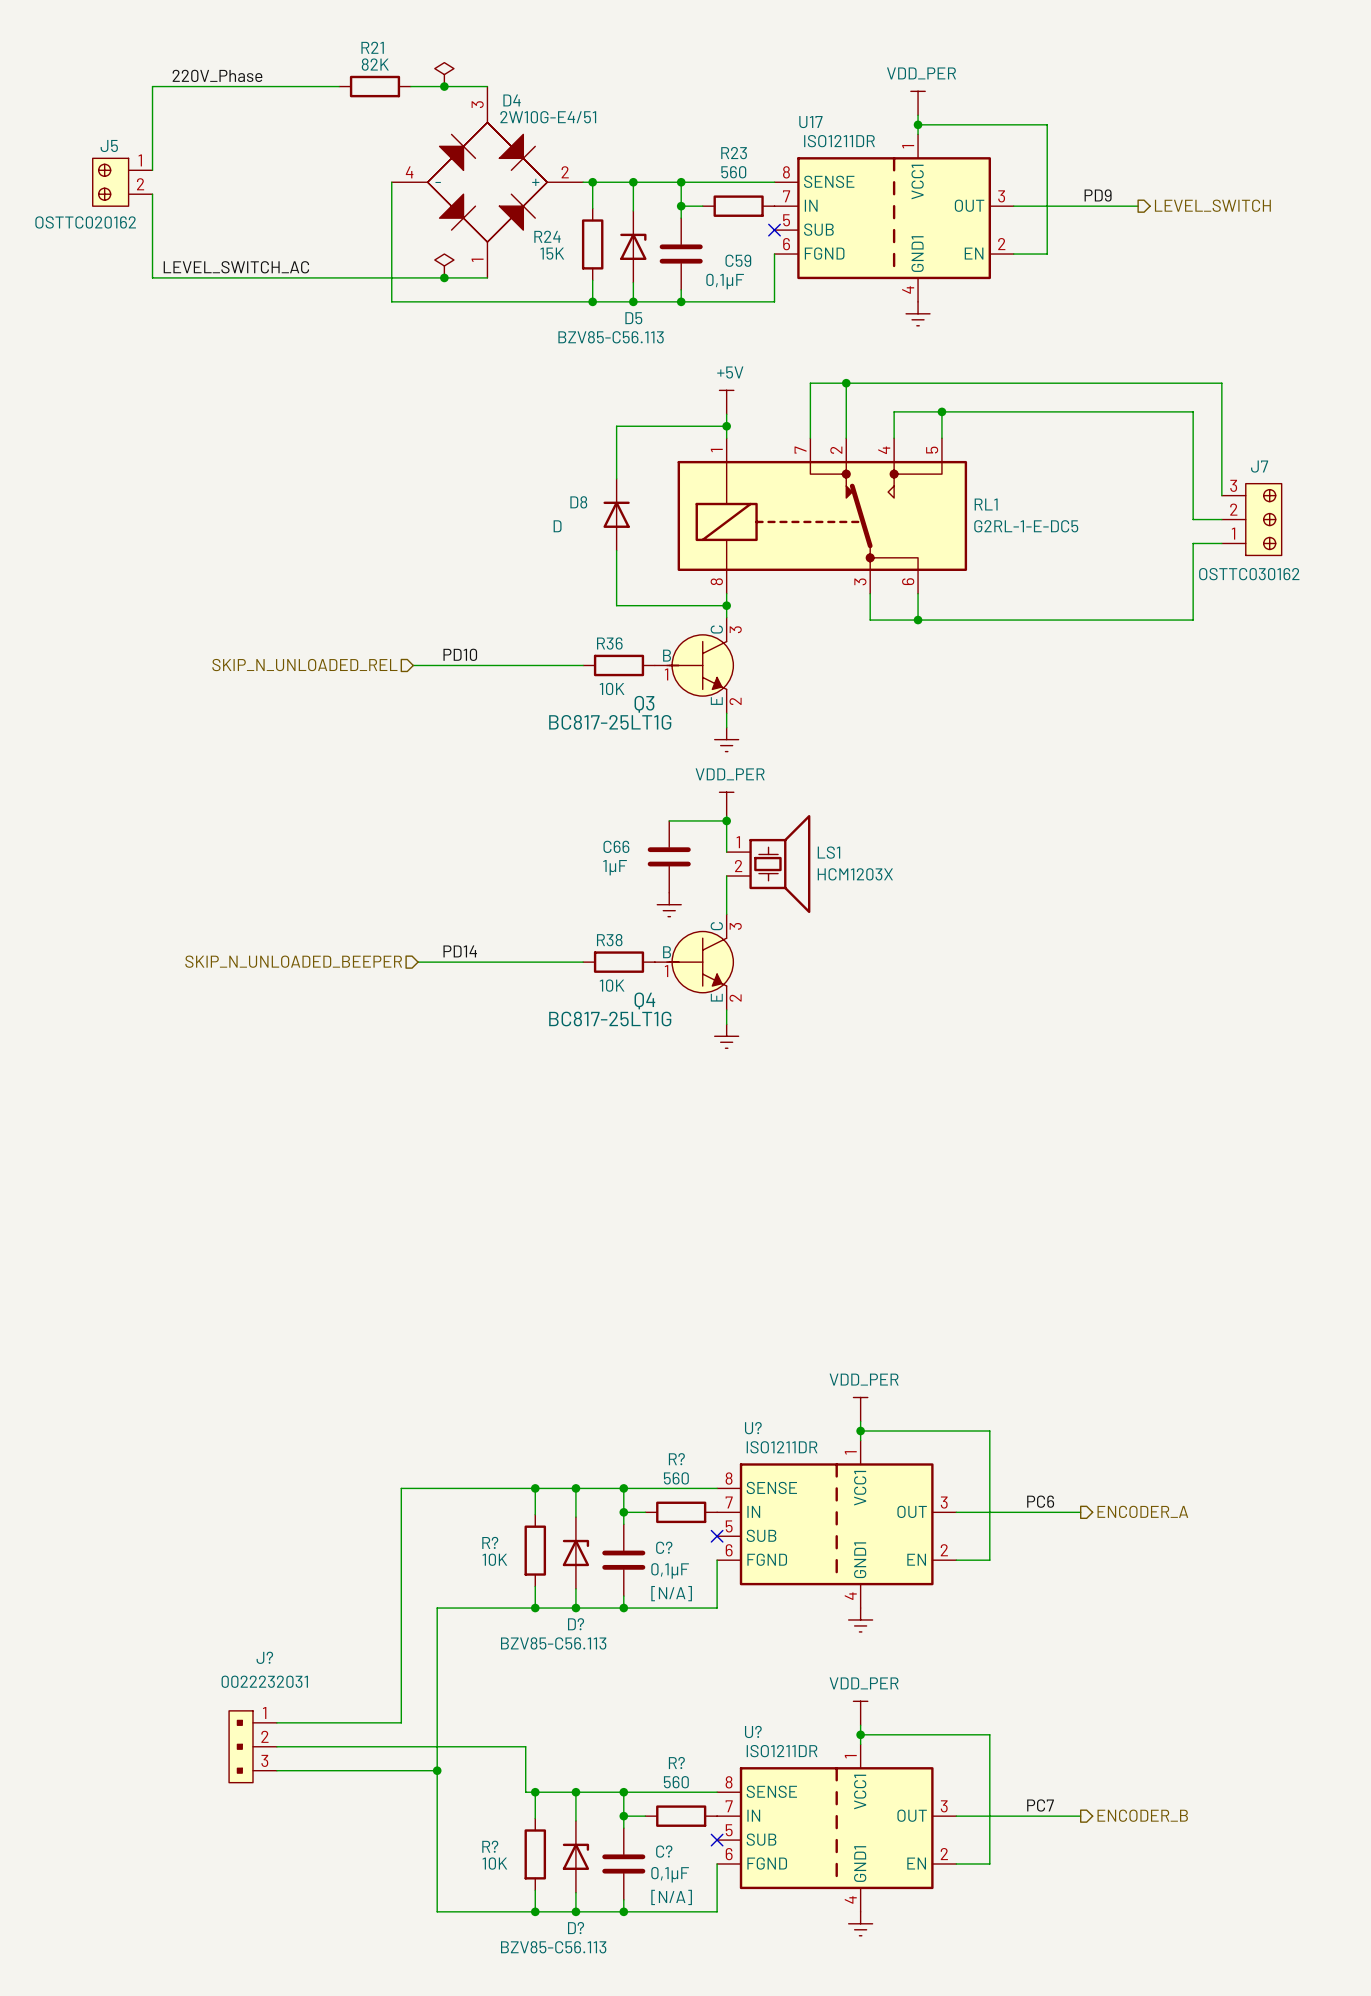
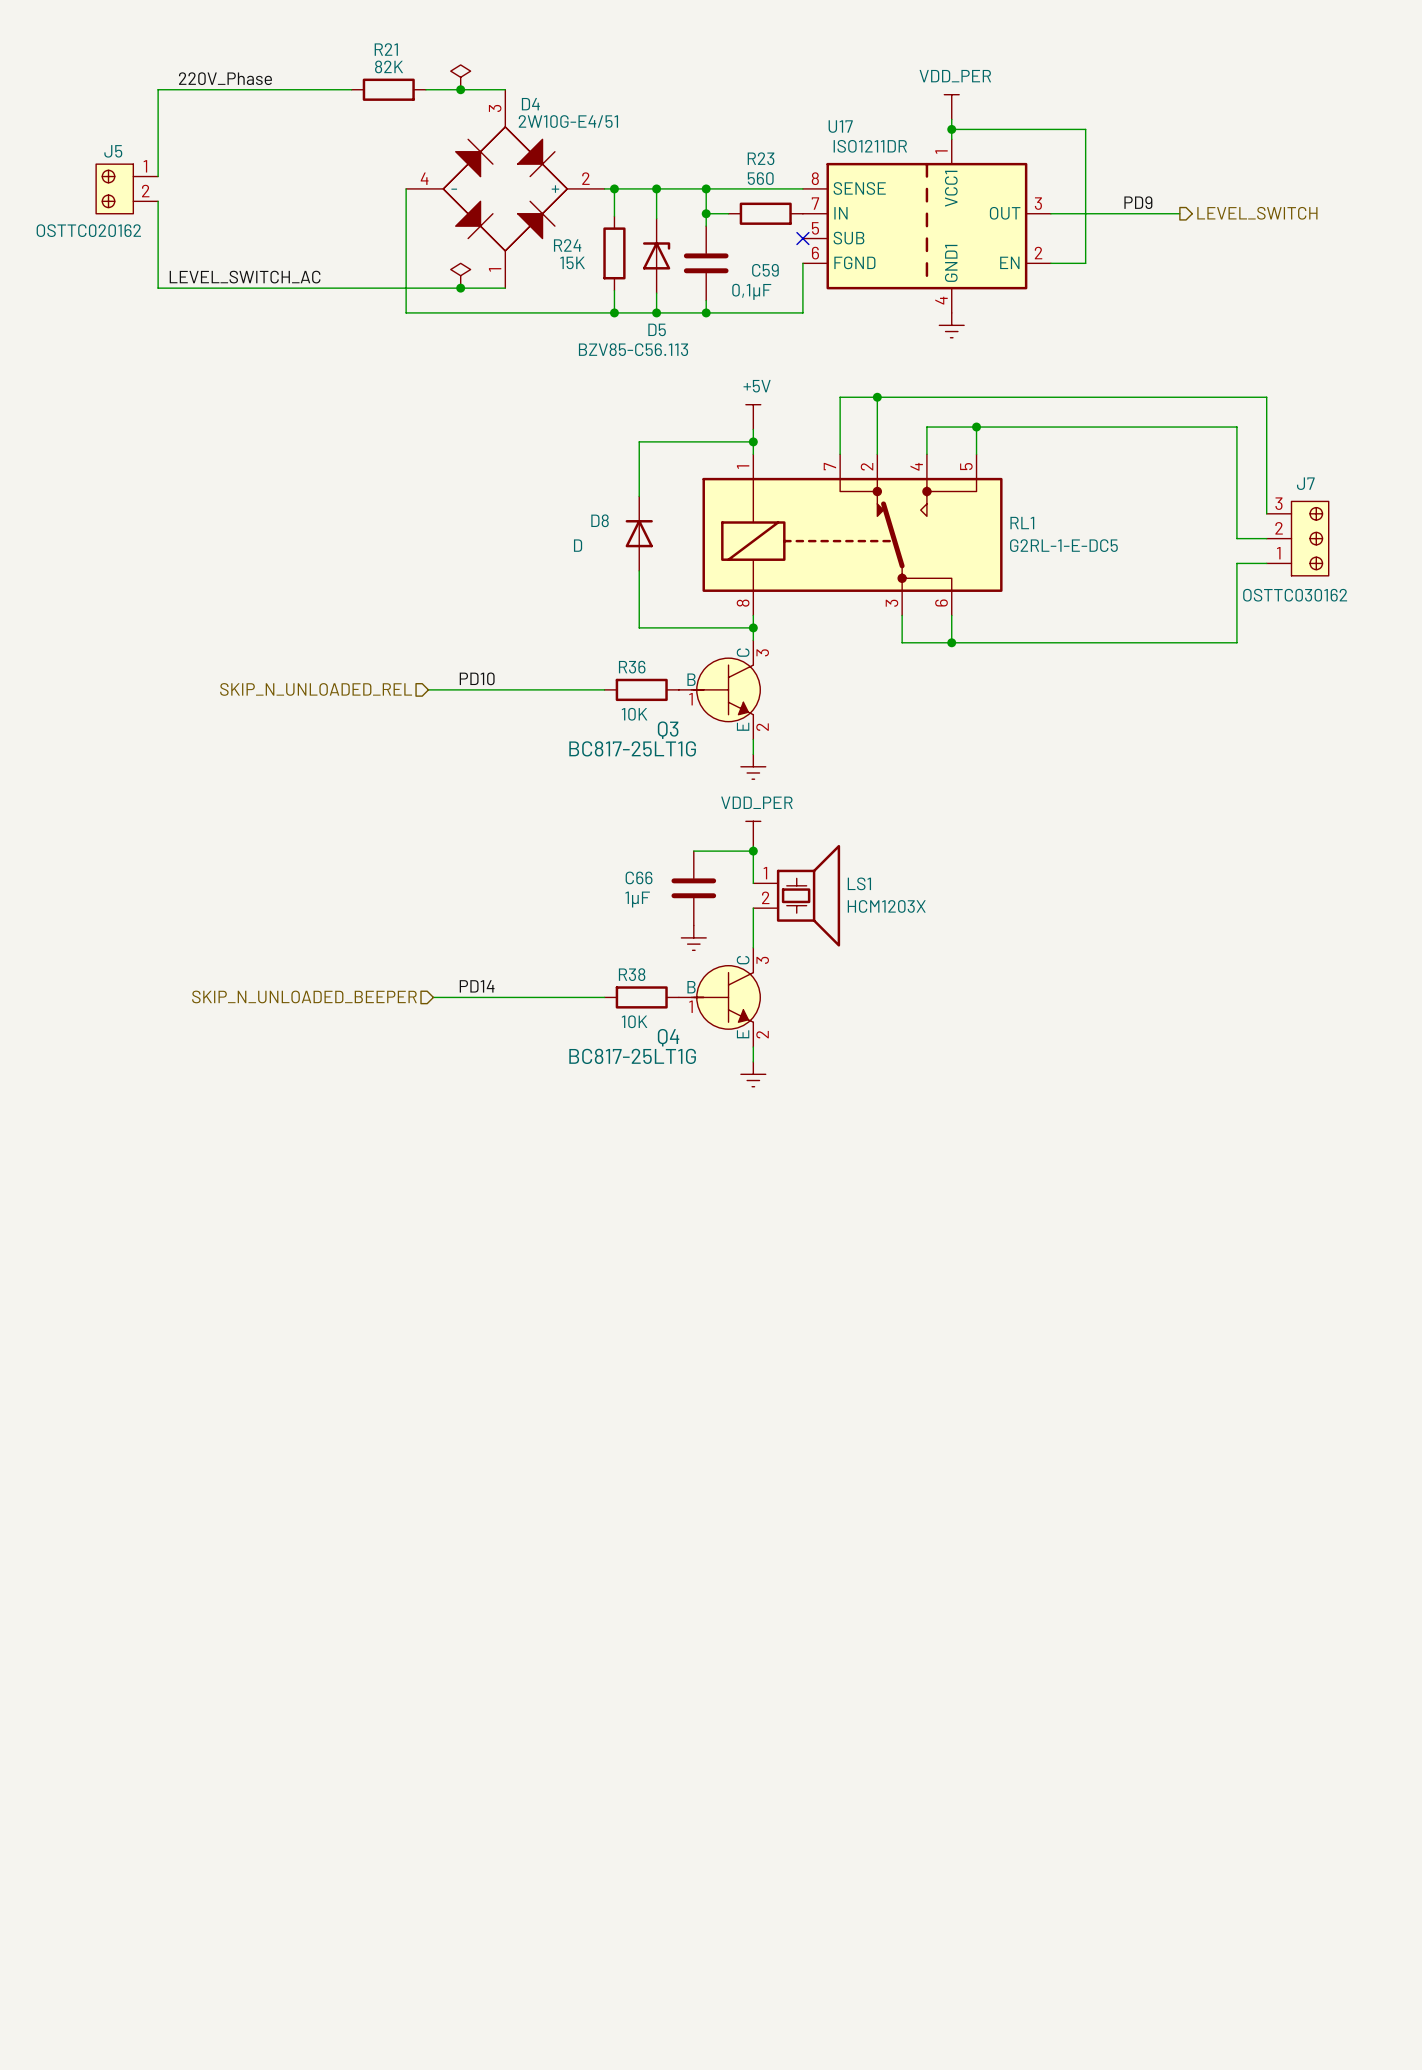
power symbol: VDD_PER (860, 1409) -> none
wire: (860, 1421) (860, 1440) -> none
wire: (860, 1431) (989, 1431) (989, 1560) (956, 1560) -> none
junction: (860, 1431) -> none
wire: (535, 1488) (535, 1514) -> none
junction: (535, 1488) -> none
wire: (575, 1488) (575, 1517) -> none
junction: (575, 1488) -> none
wire: (623, 1488) (623, 1524) -> none
junction: (623, 1488) -> none
wire: (717, 1488) (401, 1488) (401, 1722) (276, 1722) -> none
label: PC6 (1040, 1501) -> none
hierarchical label: ENCODER_A (1142, 1511) -> none
wire: (623, 1512) (645, 1512) -> none
junction: (623, 1512) -> none
R?: 560 (681, 1512) -> none
wire: (956, 1512) (1080, 1512) -> none
U?: ISO1211DR (836, 1524) -> none
no-connect mark: (717, 1536) -> none
R?: 10K (535, 1550) -> none
D?: BZV85-C56.113 (575, 1553) -> none
C?: 0,1µF (623, 1560) -> none
wire: (717, 1560) (717, 1608) (437, 1608) (437, 1911) (717, 1911) (717, 1863) -> none
wire: (535, 1586) (535, 1608) -> none
wire: (575, 1588) (575, 1608) -> none
wire: (623, 1596) (623, 1608) -> none
junction: (535, 1608) -> none
junction: (575, 1608) -> none
junction: (623, 1608) -> none
power symbol: (860, 1619) -> none
power symbol: VDD_PER (860, 1713) -> none
wire: (860, 1725) (860, 1744) -> none
wire: (860, 1734) (989, 1734) (989, 1863) (956, 1863) -> none
junction: (860, 1734) -> none
J?: 0022232031 (252, 1746) -> none
wire: (276, 1746) (525, 1746) (525, 1792) (717, 1792) -> none
wire: (276, 1770) (437, 1770) -> none
junction: (437, 1770) -> none
wire: (535, 1792) (535, 1818) -> none
junction: (535, 1792) -> none
wire: (575, 1792) (575, 1820) -> none
junction: (575, 1792) -> none
wire: (623, 1792) (623, 1828) -> none
junction: (623, 1792) -> none
label: PC7 (1040, 1805) -> none
hierarchical label: ENCODER_B (1142, 1815) -> none
wire: (623, 1816) (645, 1816) -> none
junction: (623, 1816) -> none
R?: 560 (681, 1816) -> none
wire: (956, 1816) (1080, 1816) -> none
U?: ISO1211DR (836, 1828) -> none
no-connect mark: (717, 1840) -> none
R?: 10K (535, 1854) -> none
D?: BZV85-C56.113 (575, 1856) -> none
C?: 0,1µF (623, 1863) -> none
wire: (535, 1890) (535, 1911) -> none
wire: (575, 1892) (575, 1911) -> none
wire: (623, 1899) (623, 1911) -> none
junction: (535, 1911) -> none
junction: (575, 1911) -> none
junction: (623, 1911) -> none
power symbol: (860, 1923) -> none

